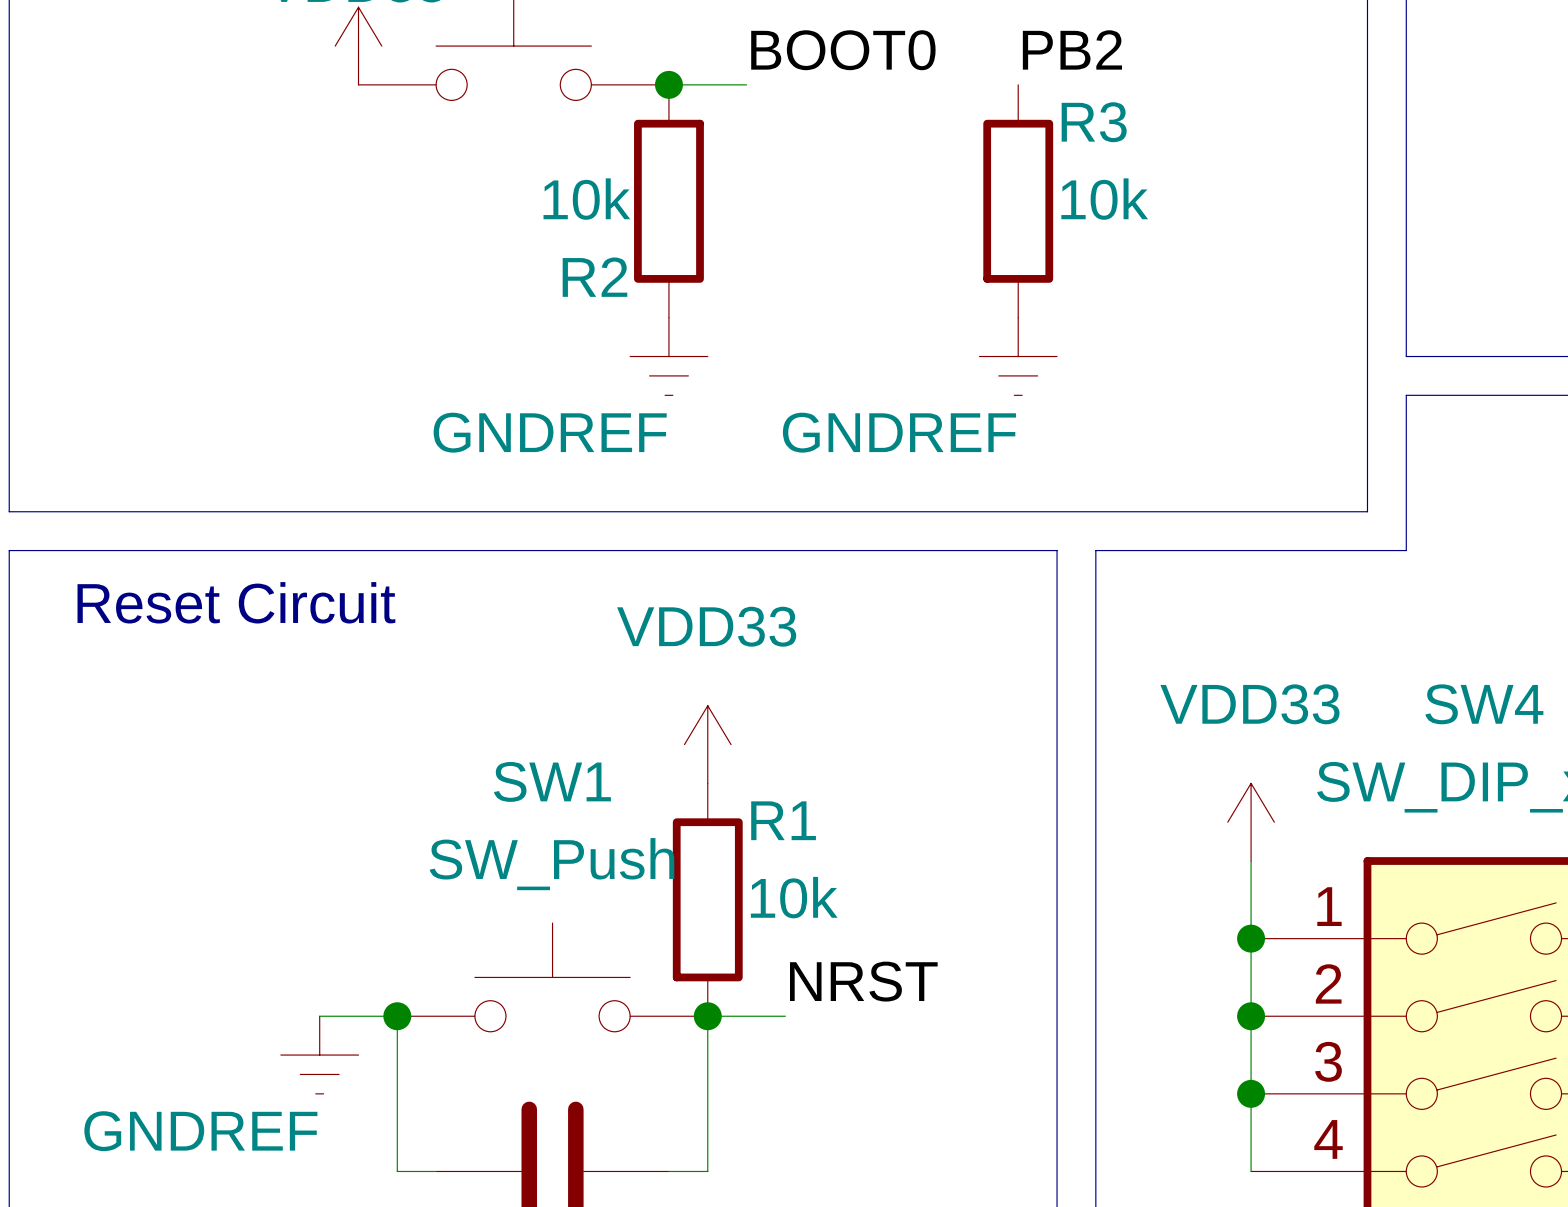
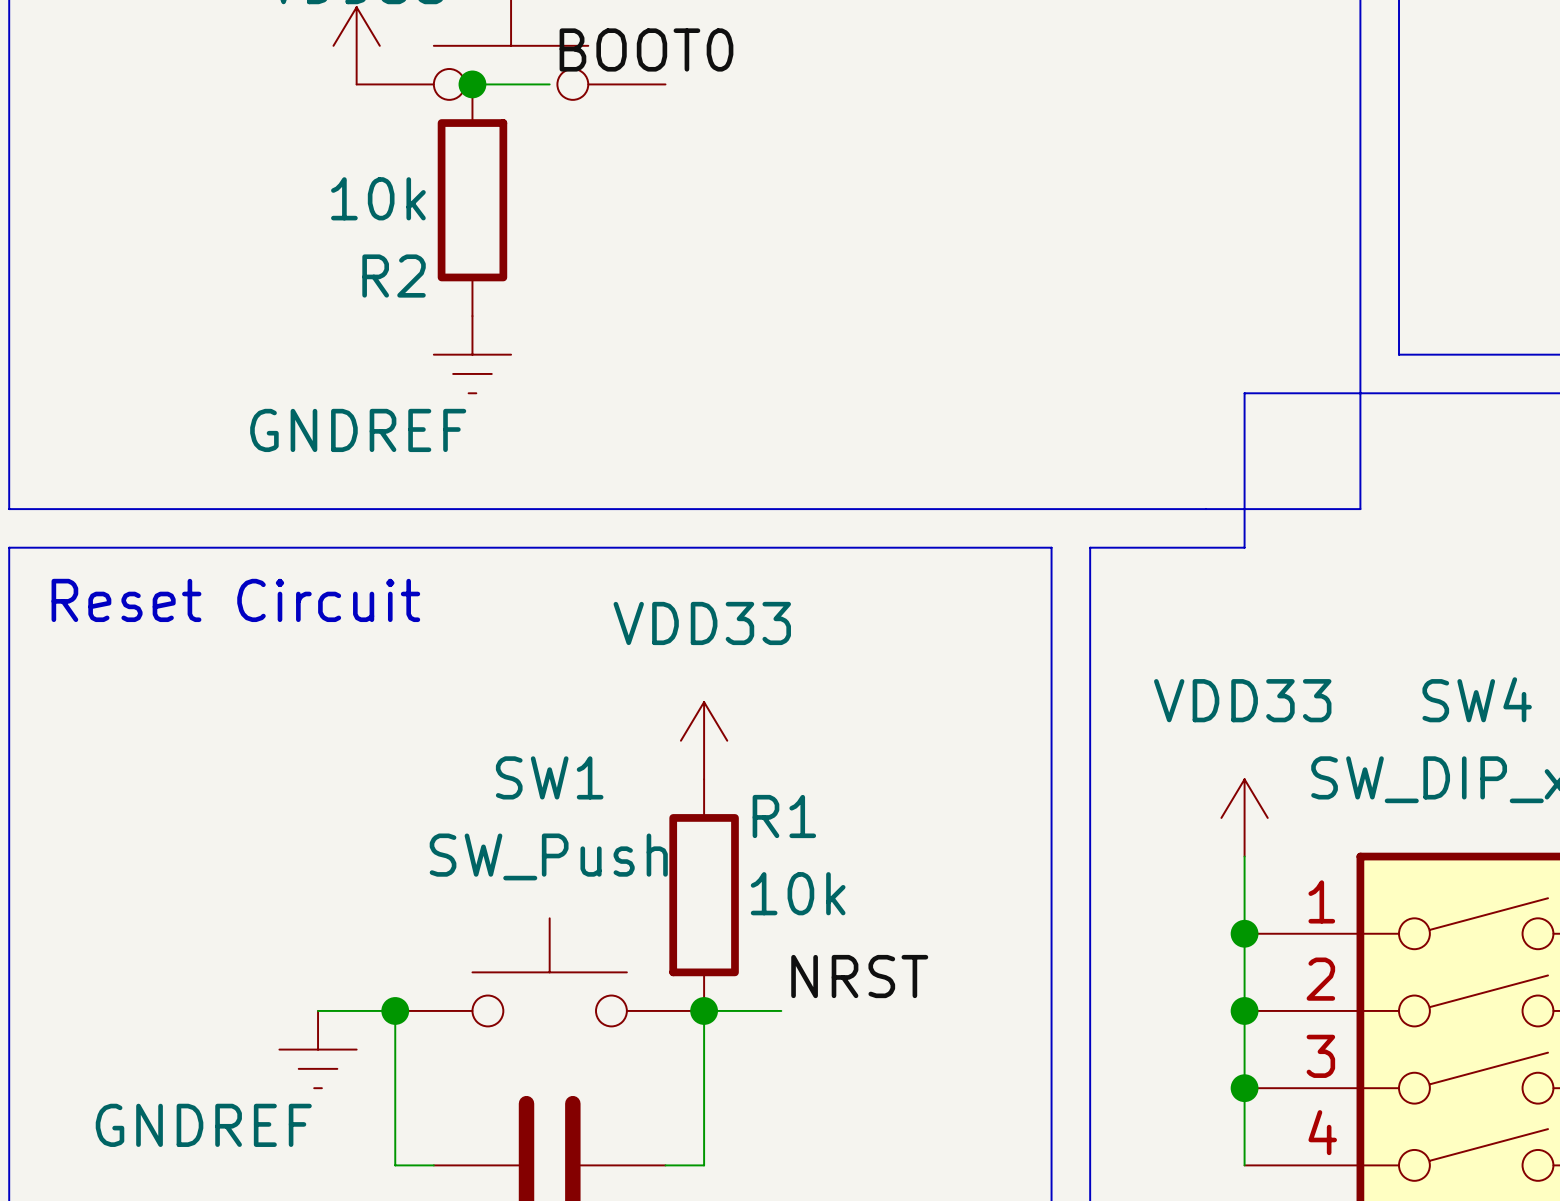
label: PB2 (1072, 49) -> none
label position: BOOT0 (843, 50) -> BOOT0 (646, 49)
junction: none -> (472, 84)
wire: (668, 84) (746, 84) -> (472, 84) (549, 84)
junction: (668, 84) -> none
R2 position: (668, 201) -> (472, 200)
R3: 10k (1018, 201) -> none
power symbol position: GNDREF (668, 356) -> GNDREF (472, 354)
power symbol: GNDREF (1018, 356) -> none
line: (1406, 395) (1406, 550) (1251, 550) -> (1399, 393) (1244, 393) (1244, 547)

